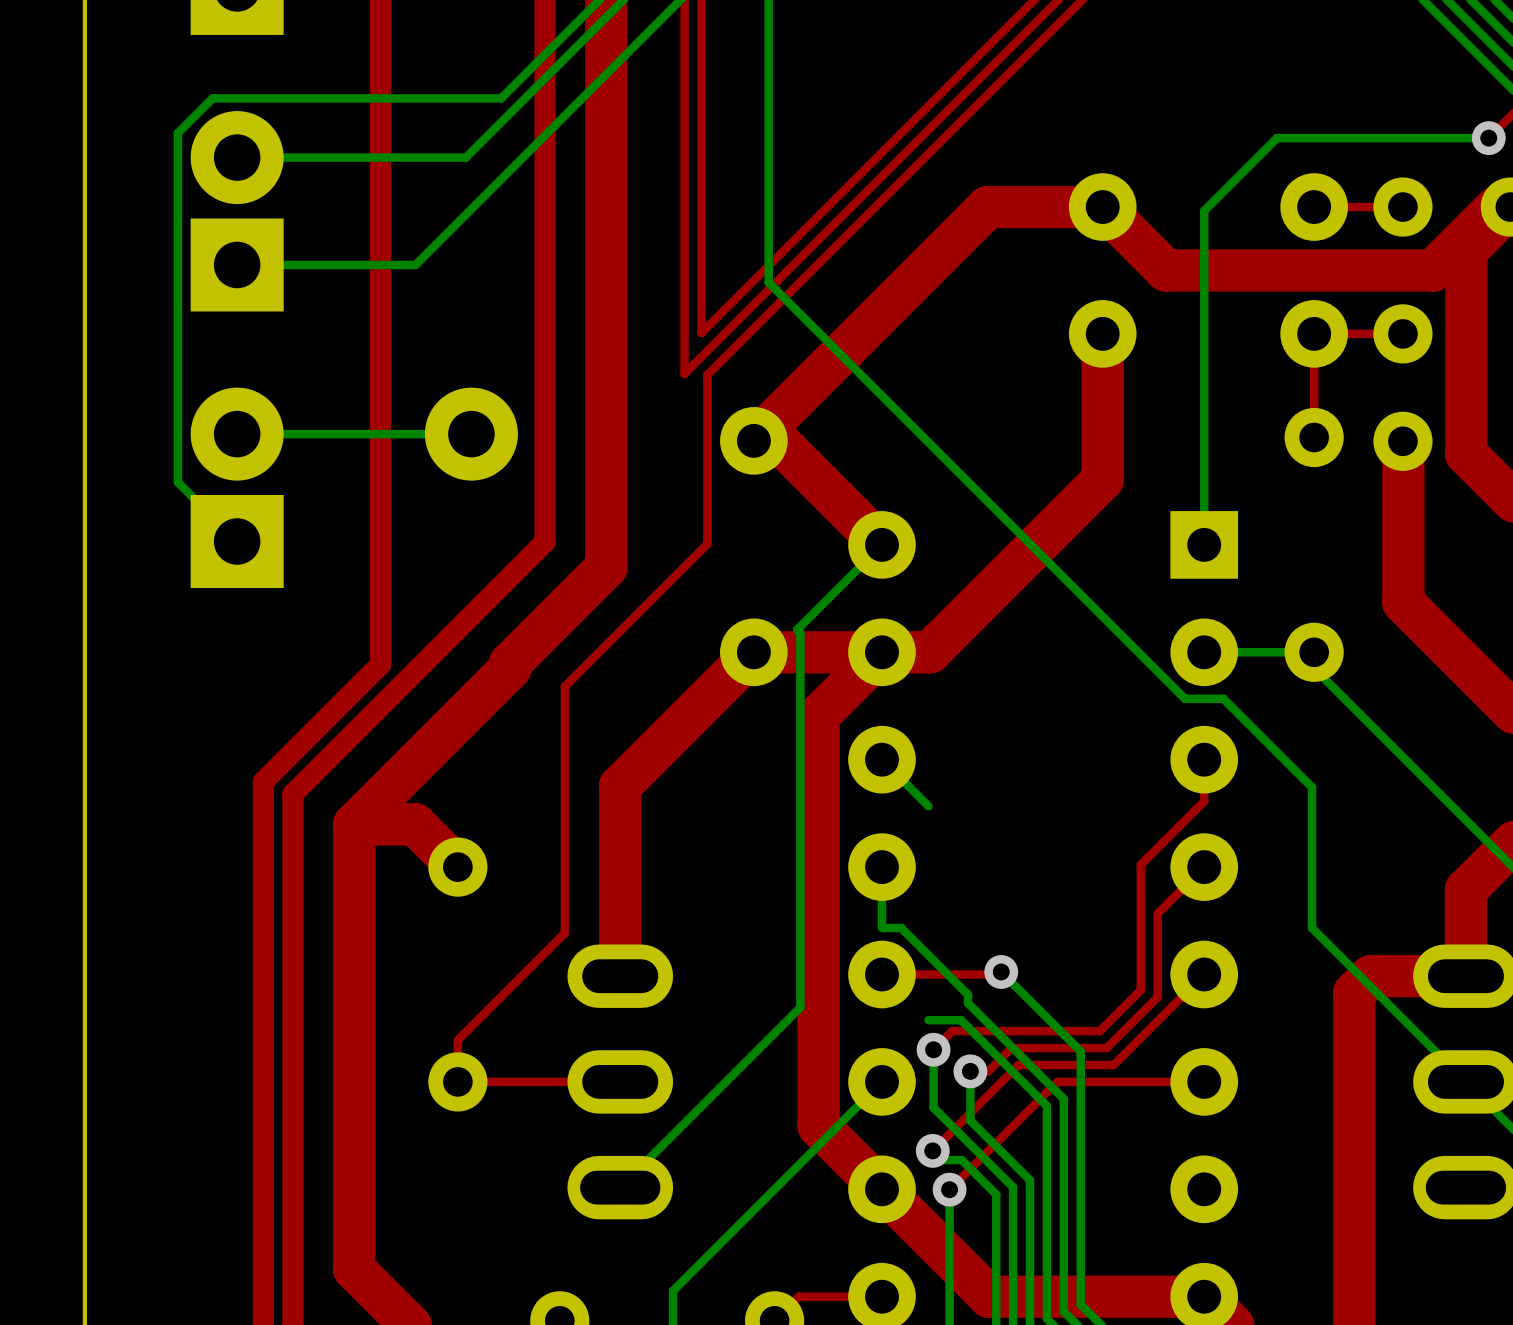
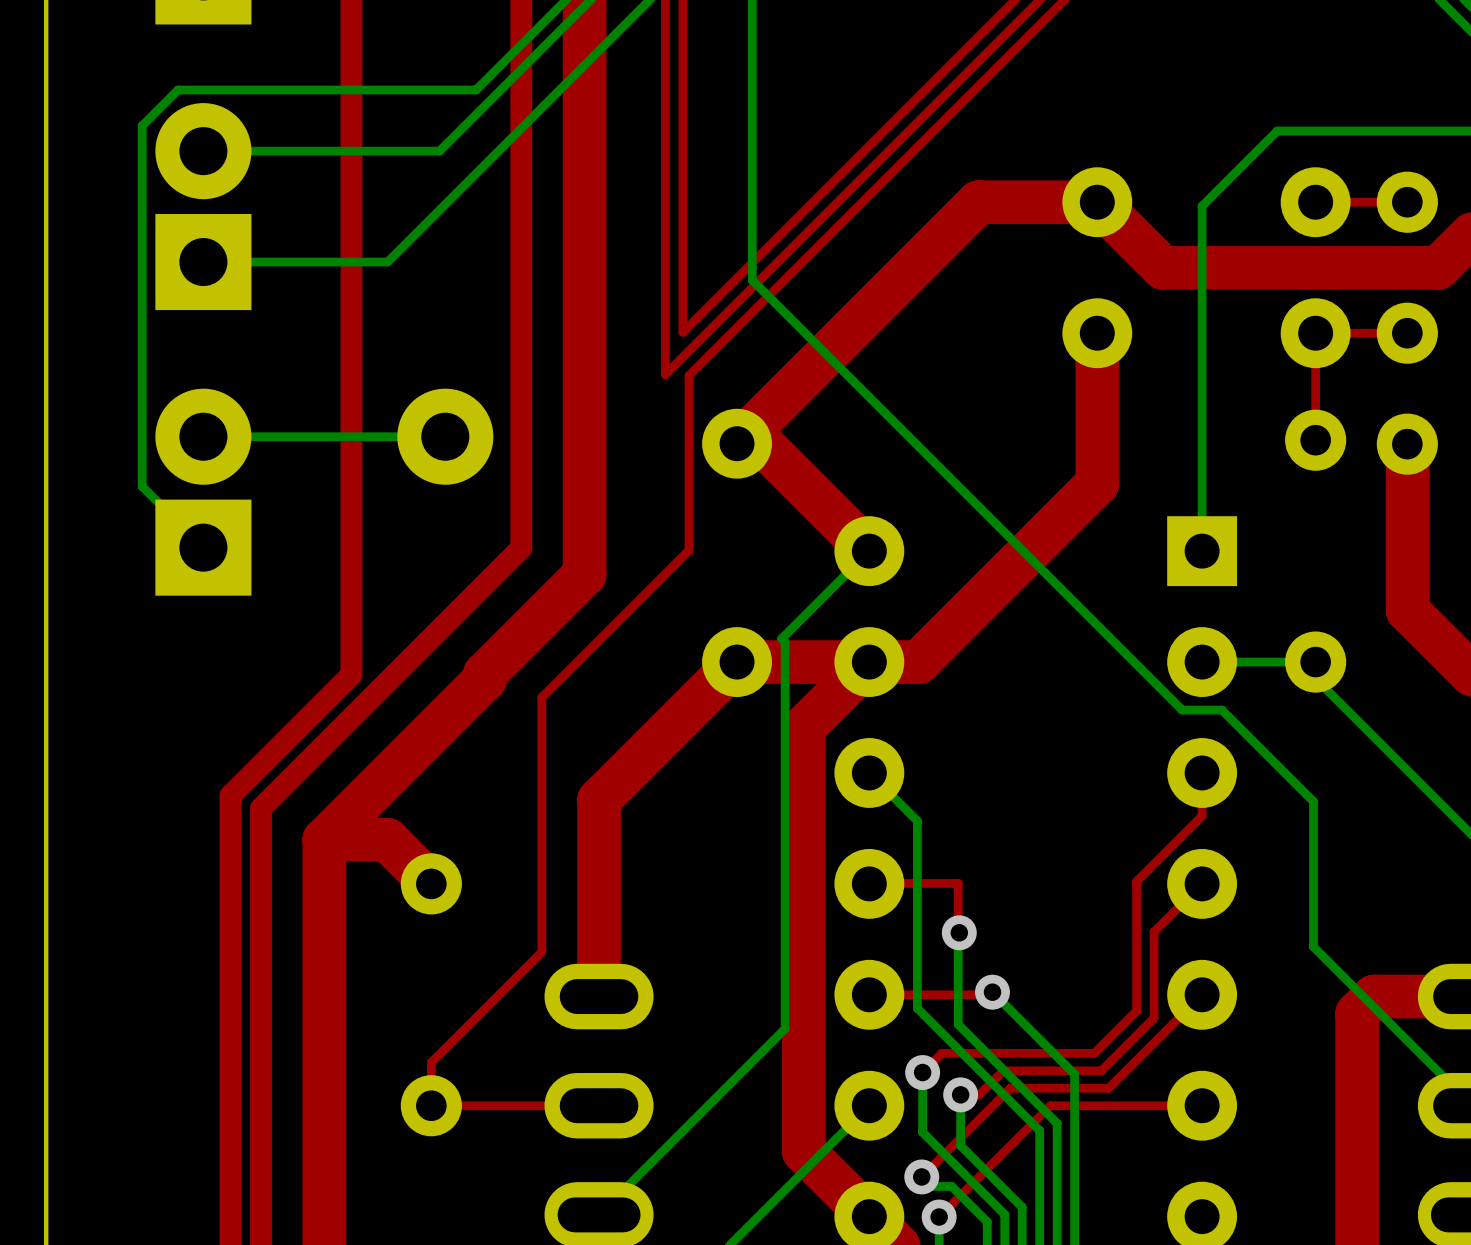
top track: none -> (869, 883) (958, 883) (959, 932)
bottom track: (882, 867) (882, 927) (901, 928) (968, 994) -> (959, 932) (958, 1015)
via: none -> (959, 932)
bottom track: (961, 1020) (928, 1020) -> (951, 1041) (917, 1008) (917, 821)

